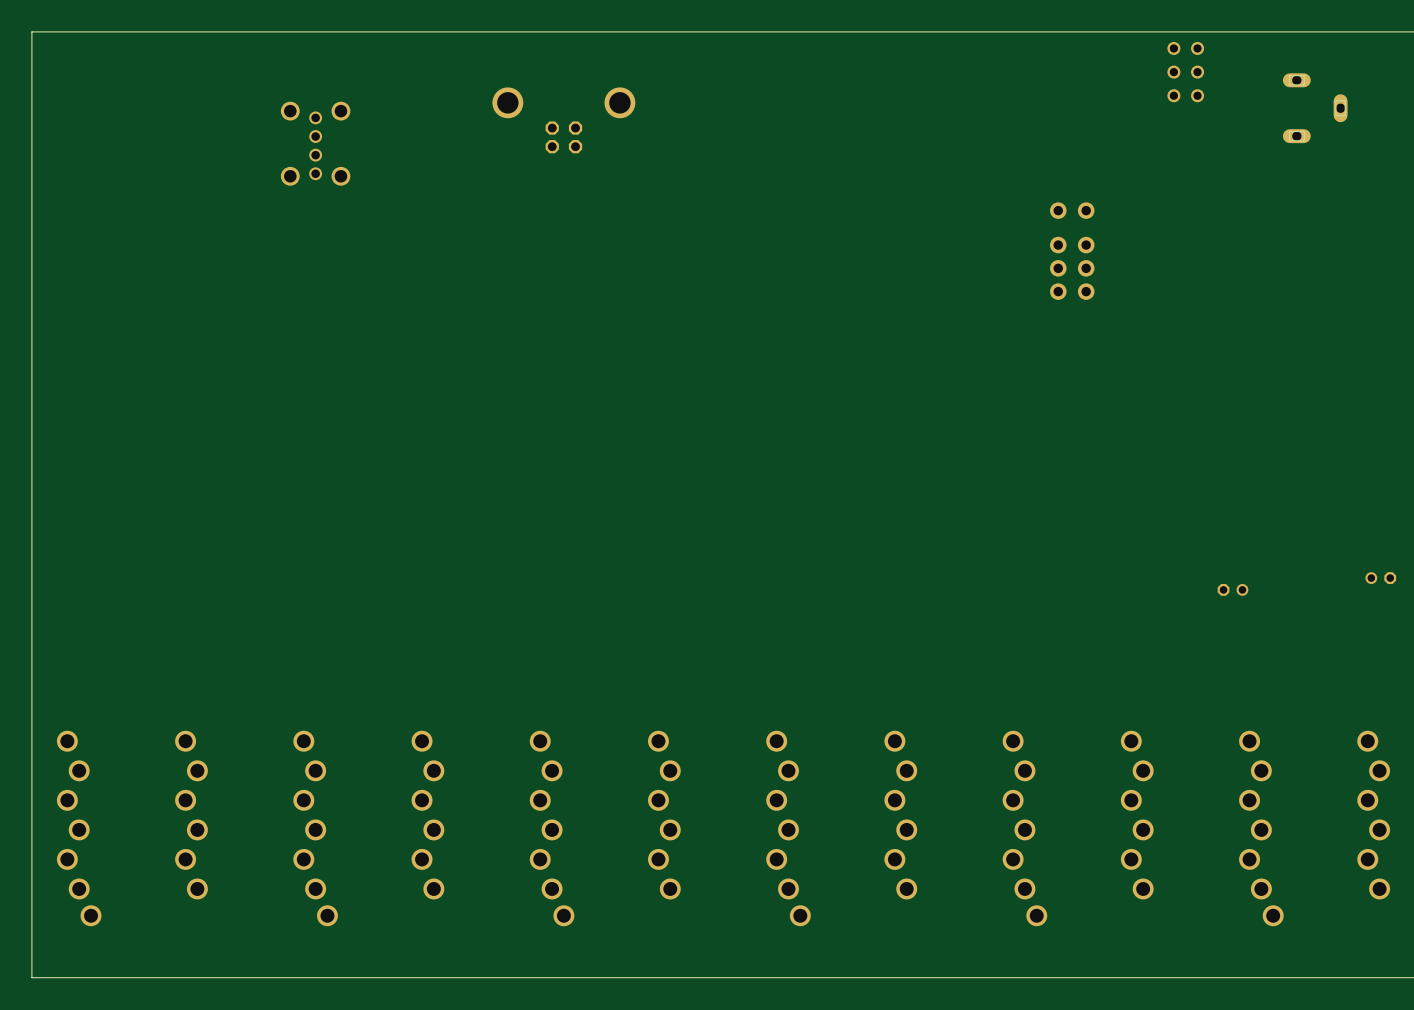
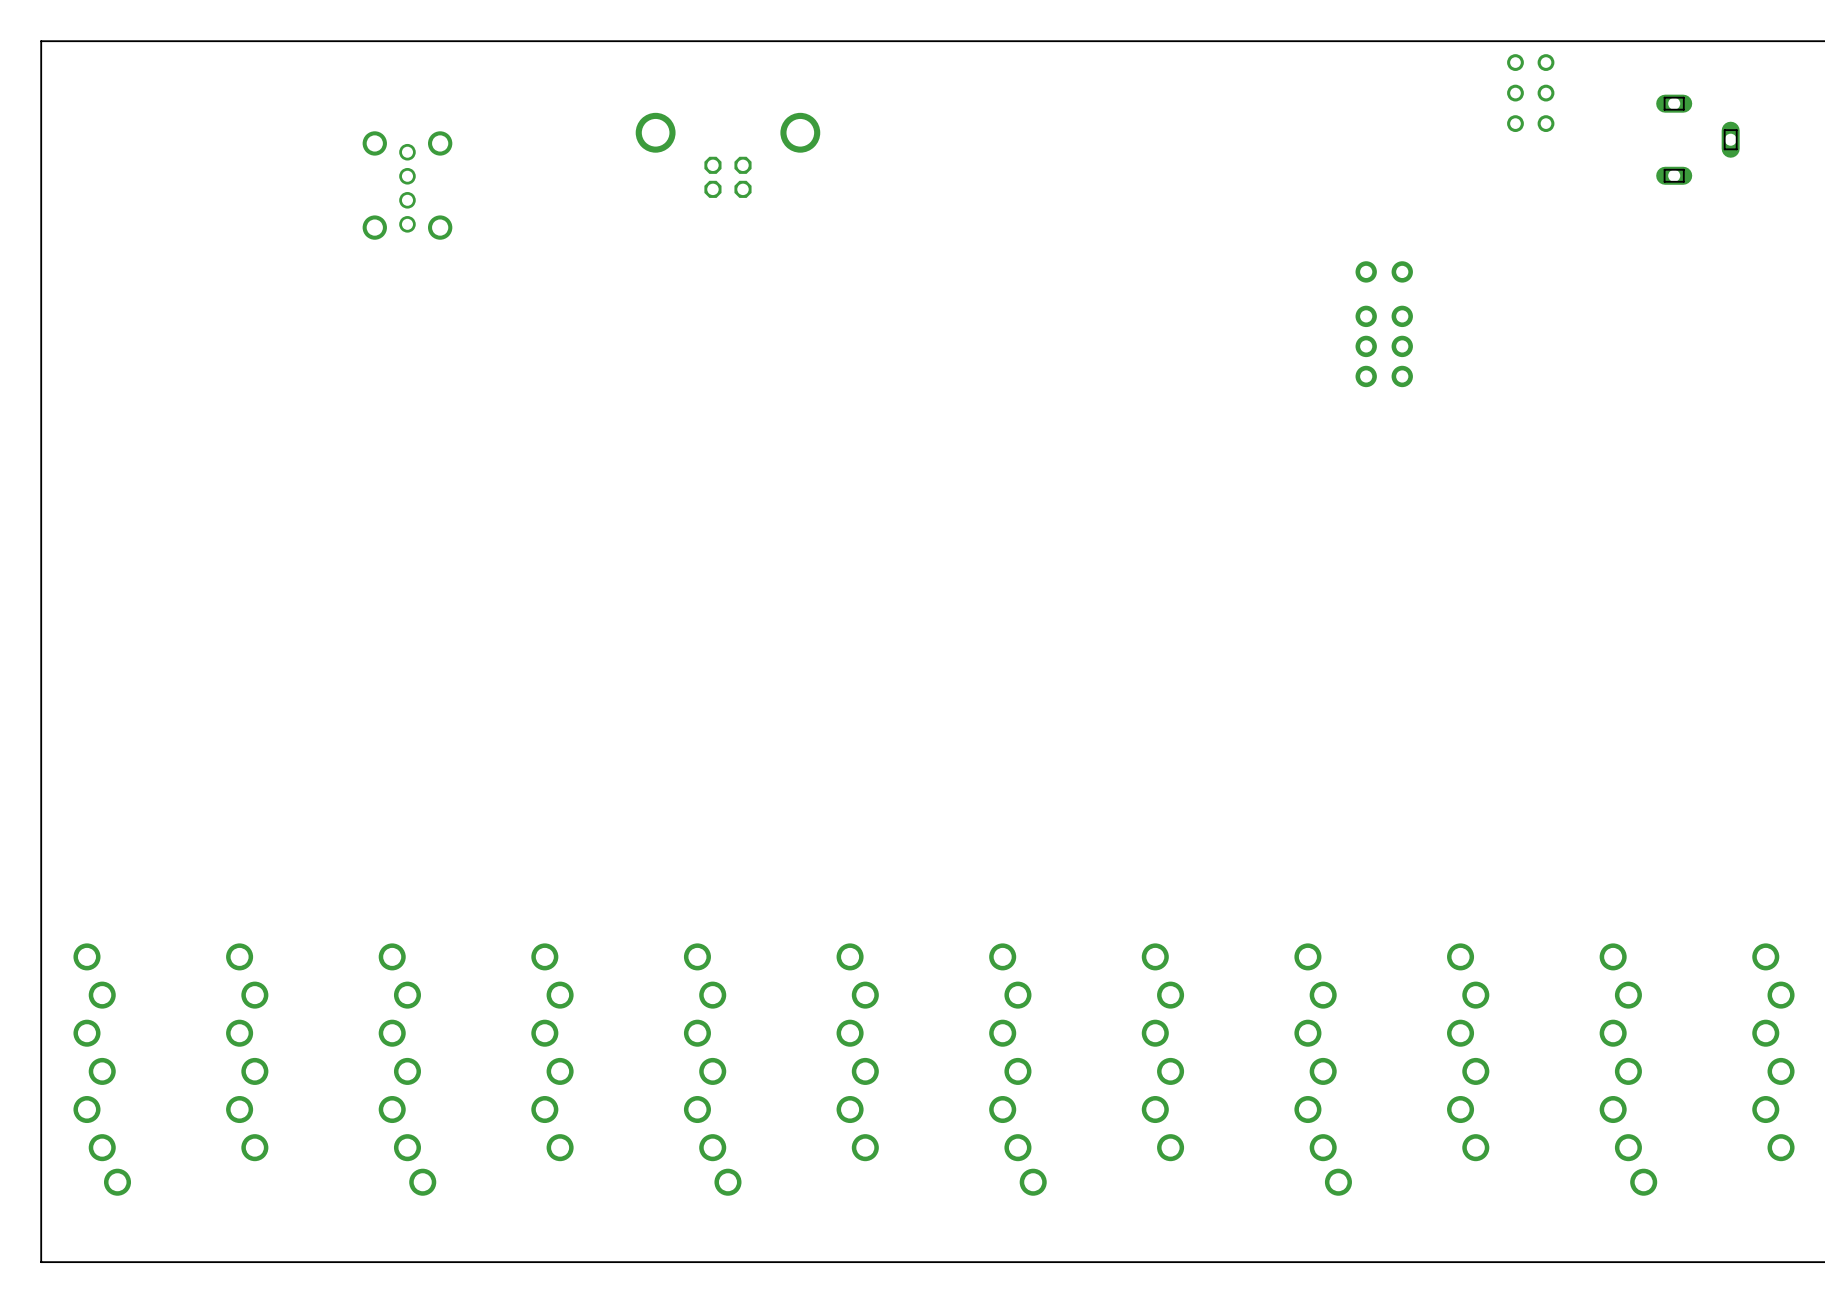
part: (1380, 578) -> none
part: (1233, 589) -> none

